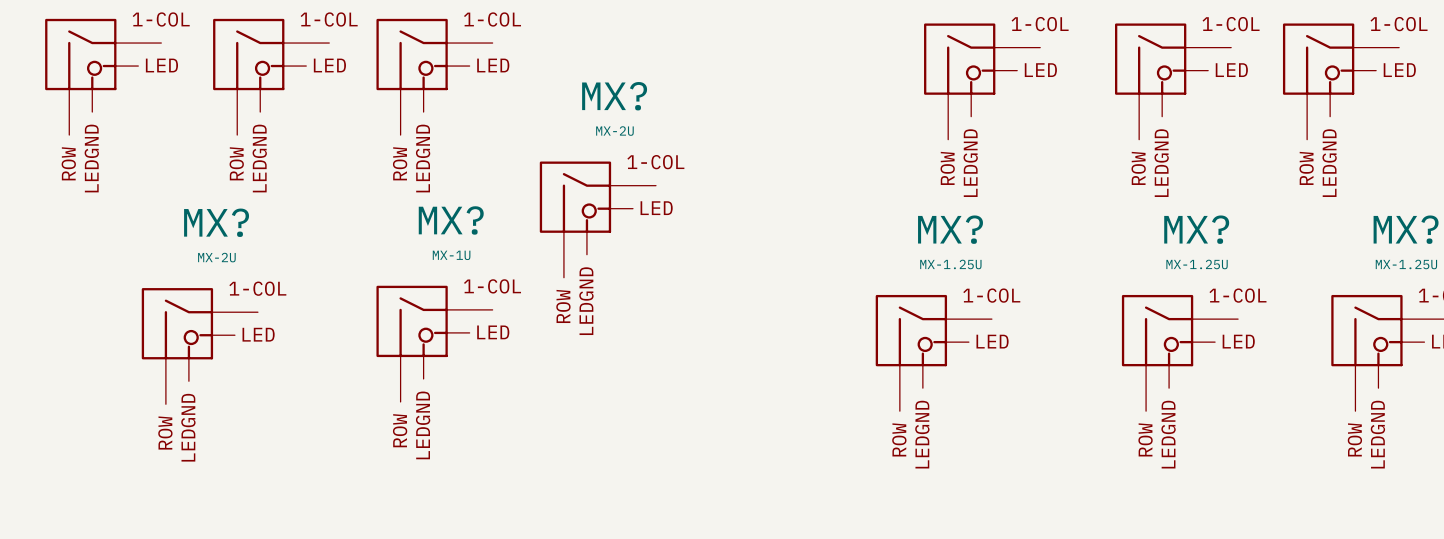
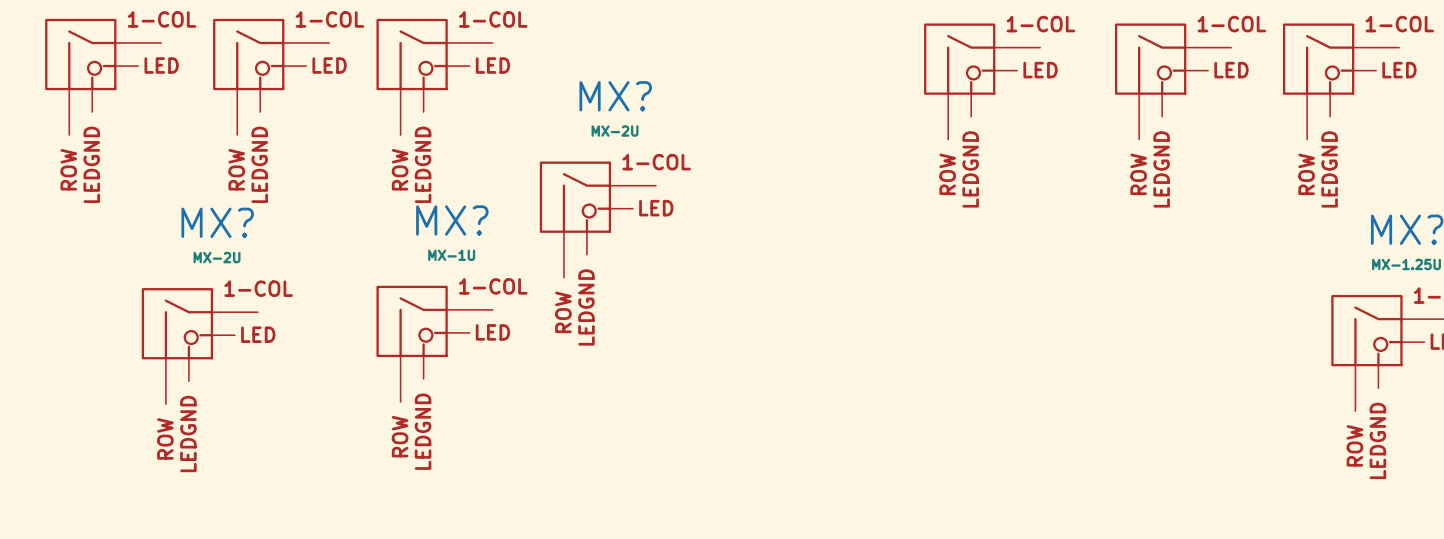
MX?: MX-1.25U (933, 353) -> none
MX?: MX-1.25U (1179, 353) -> none

